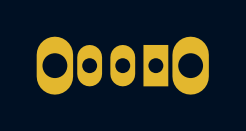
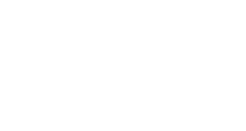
part: (122, 65) -> none

